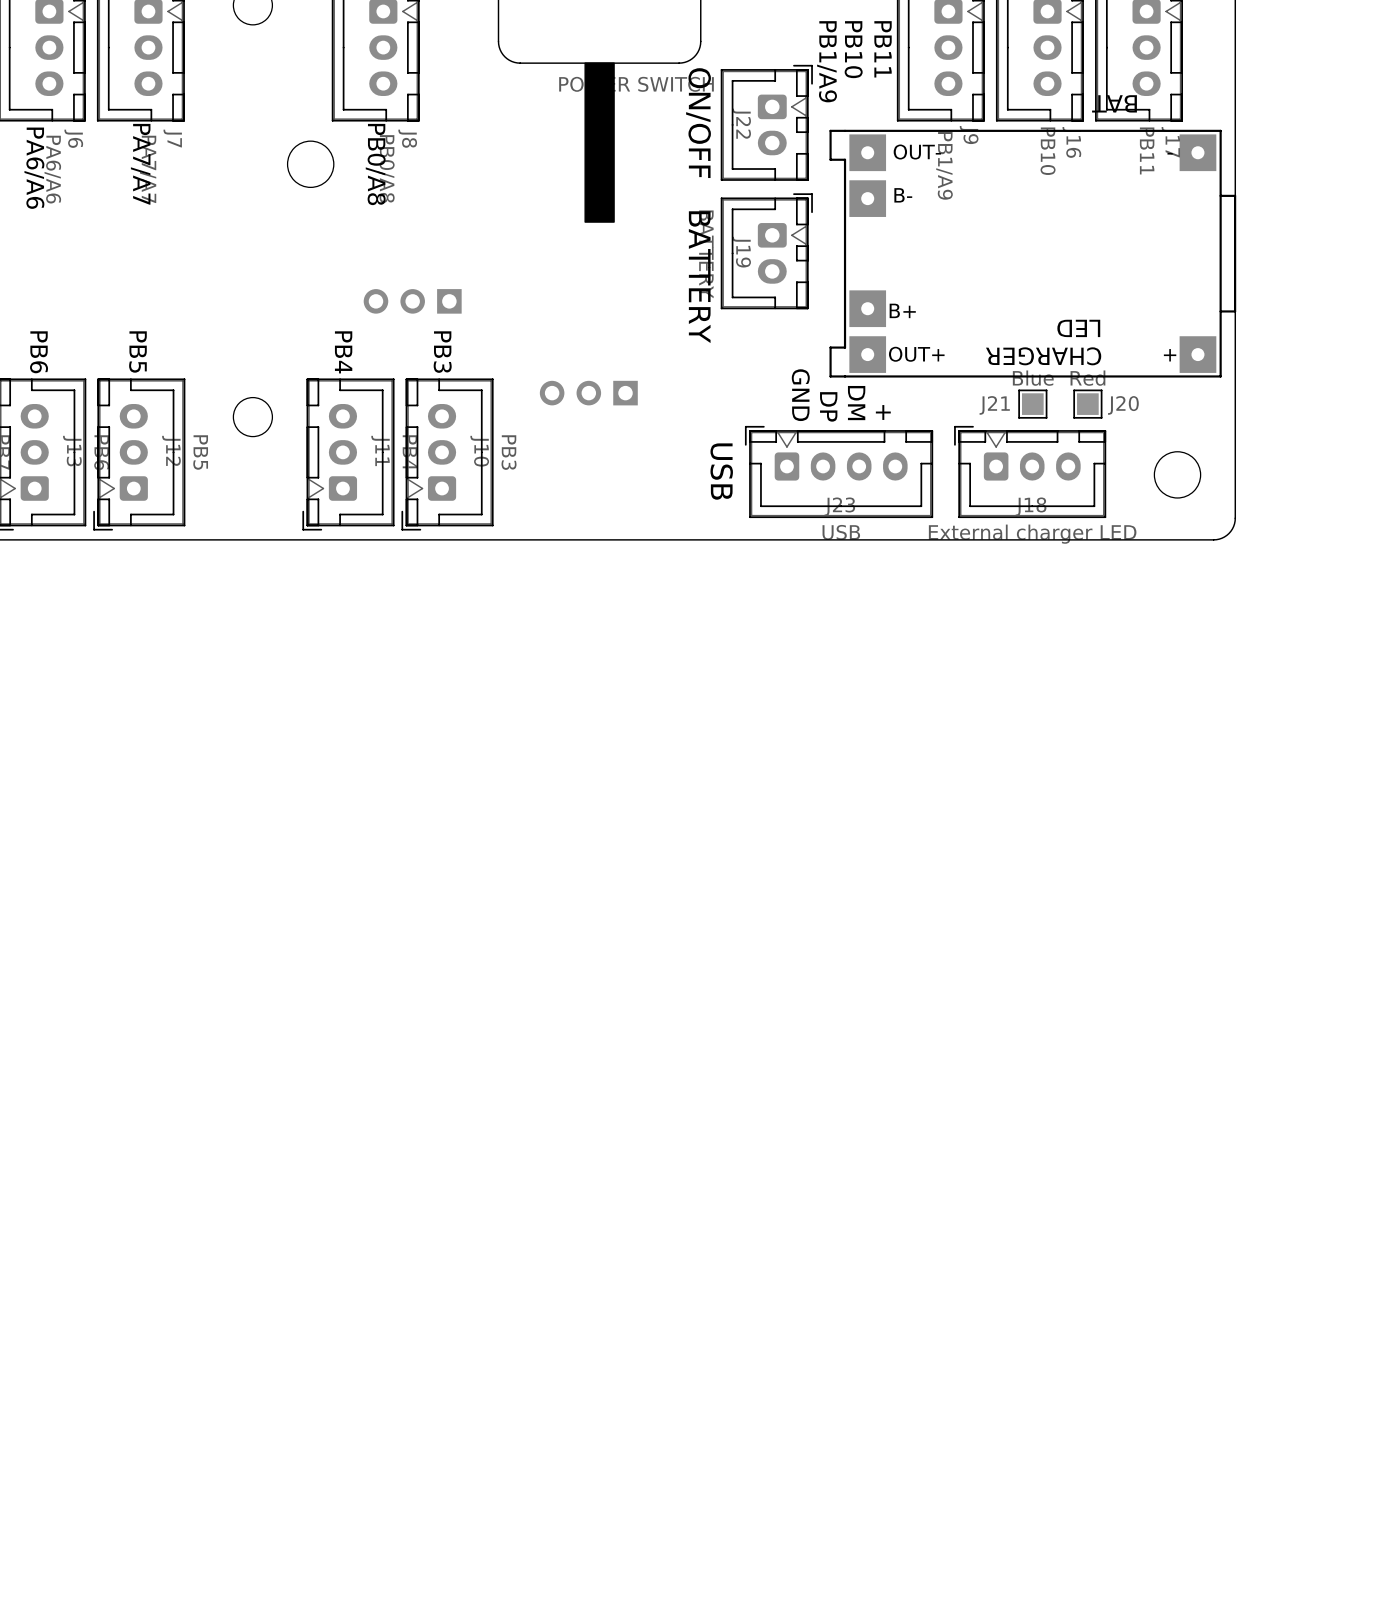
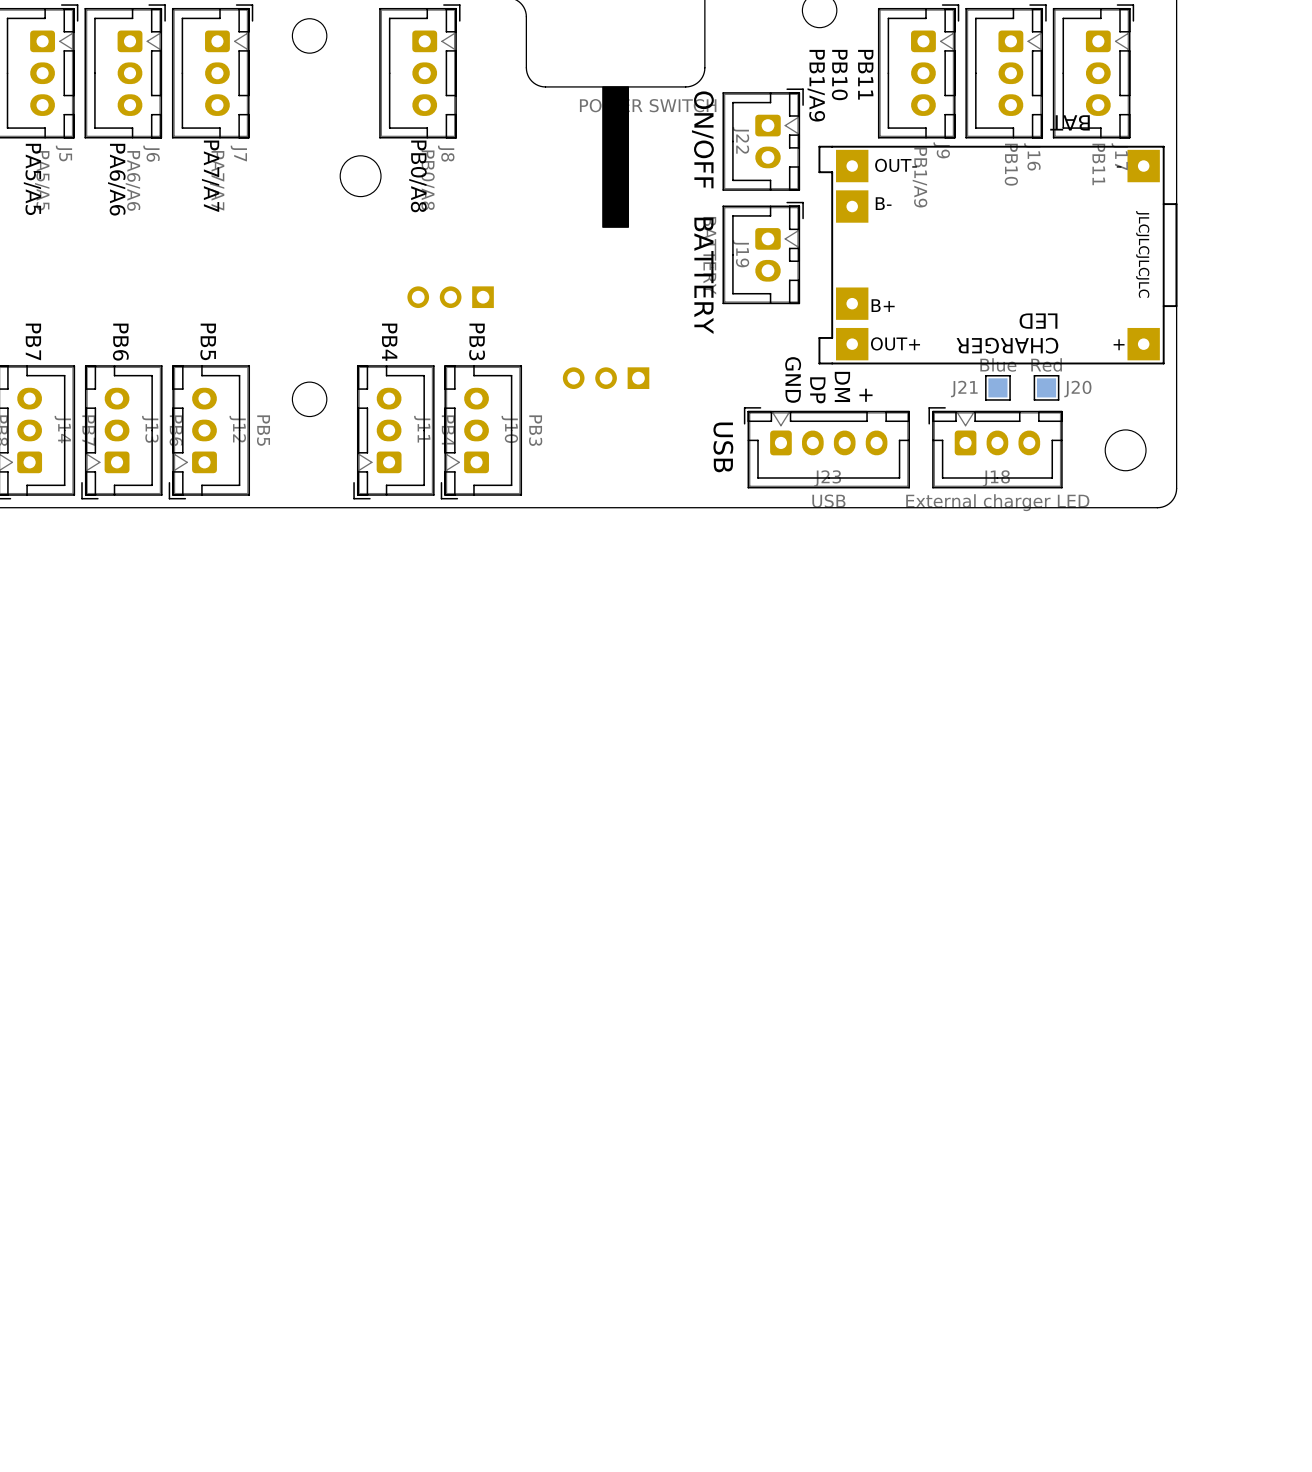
text: none -> JLCJLCJLCJLC (1142, 254)

